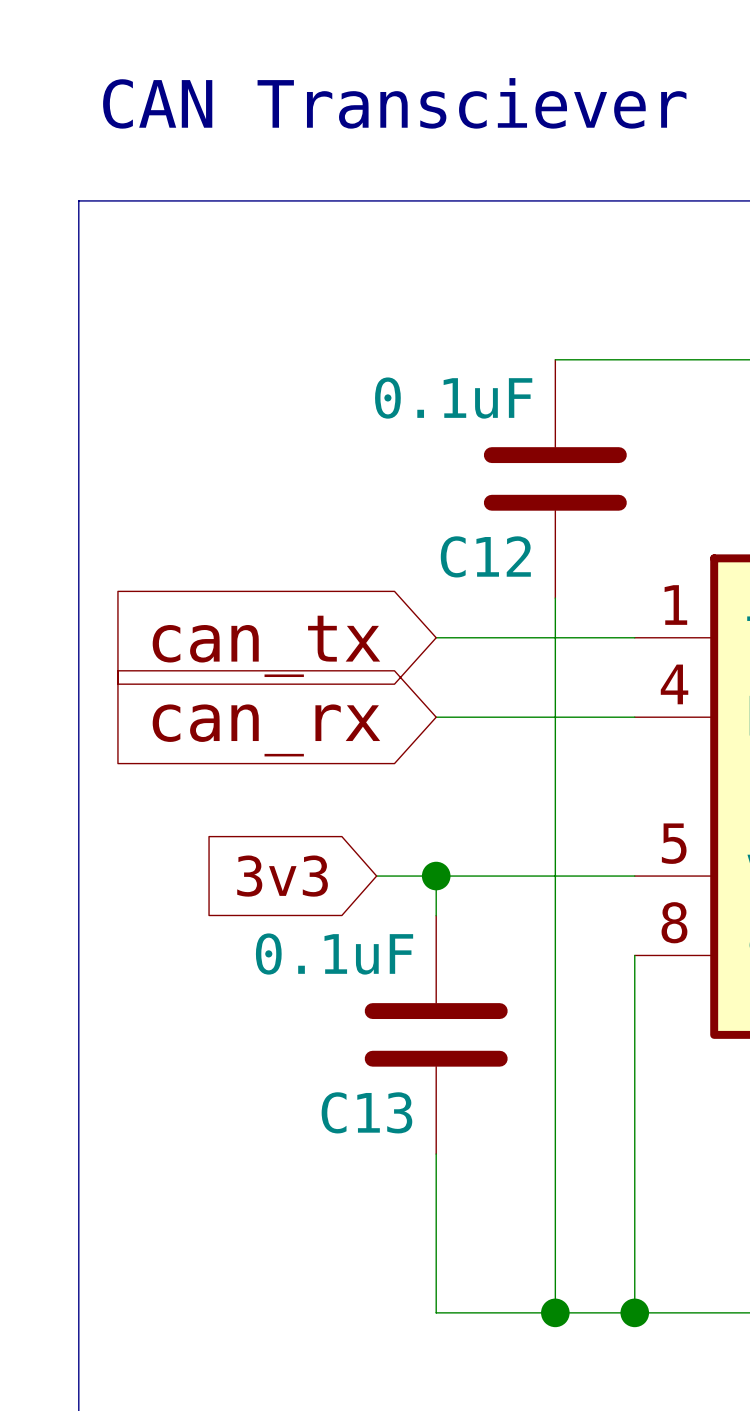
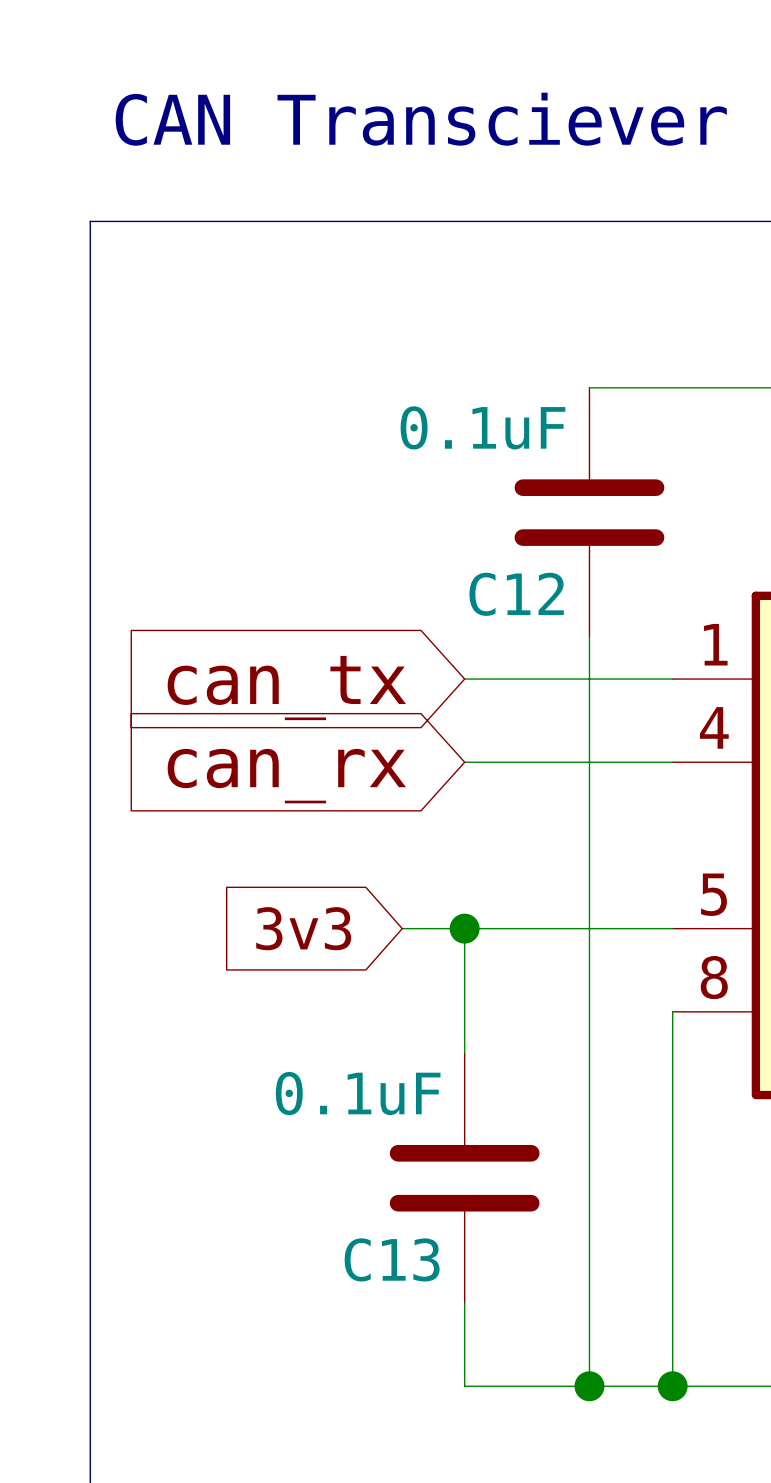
C13 position: (436, 1034) -> (464, 1178)

